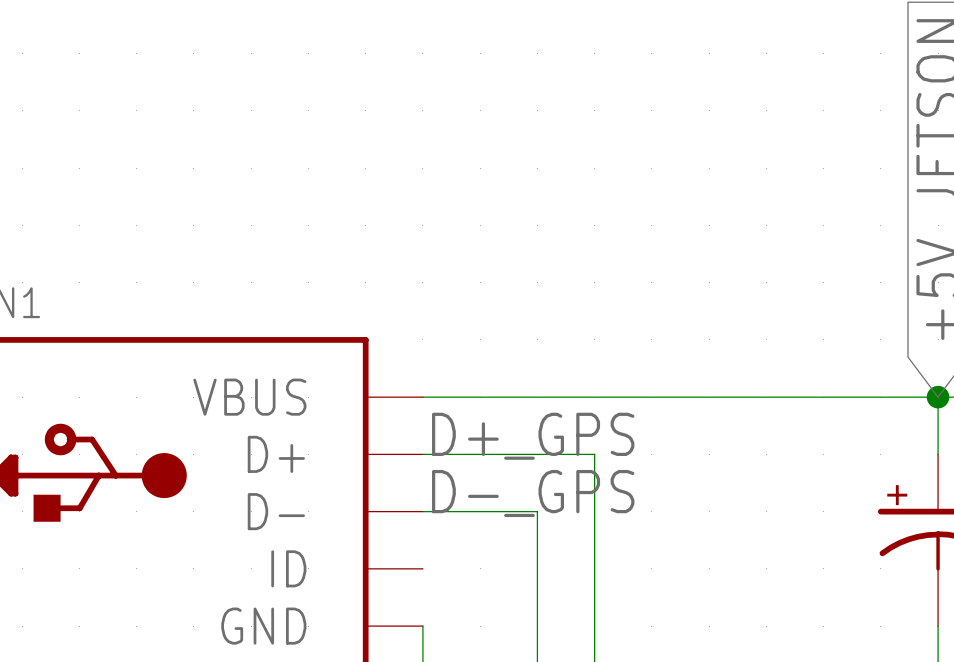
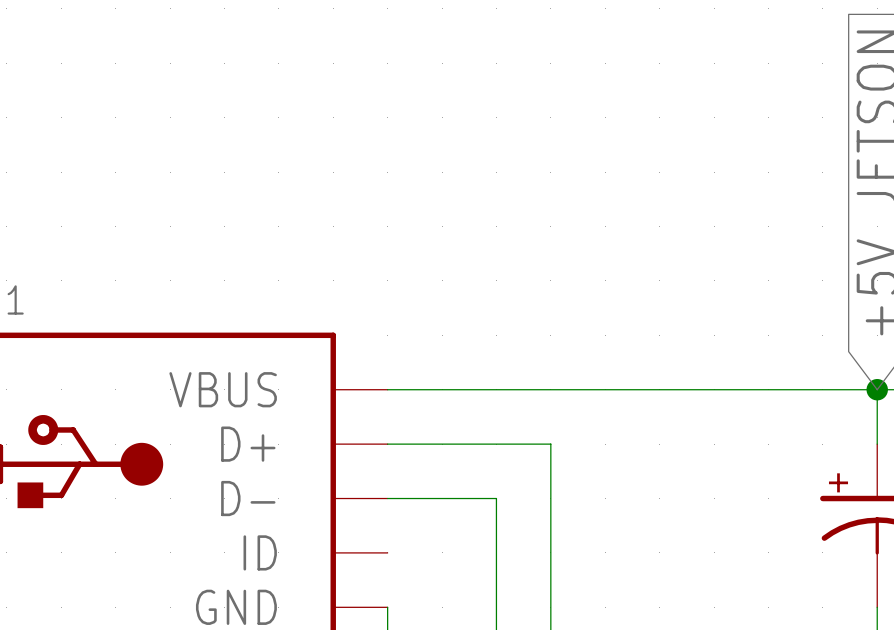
label: D+_GPS (533, 436) -> none
label: D-_GPS (533, 493) -> none

